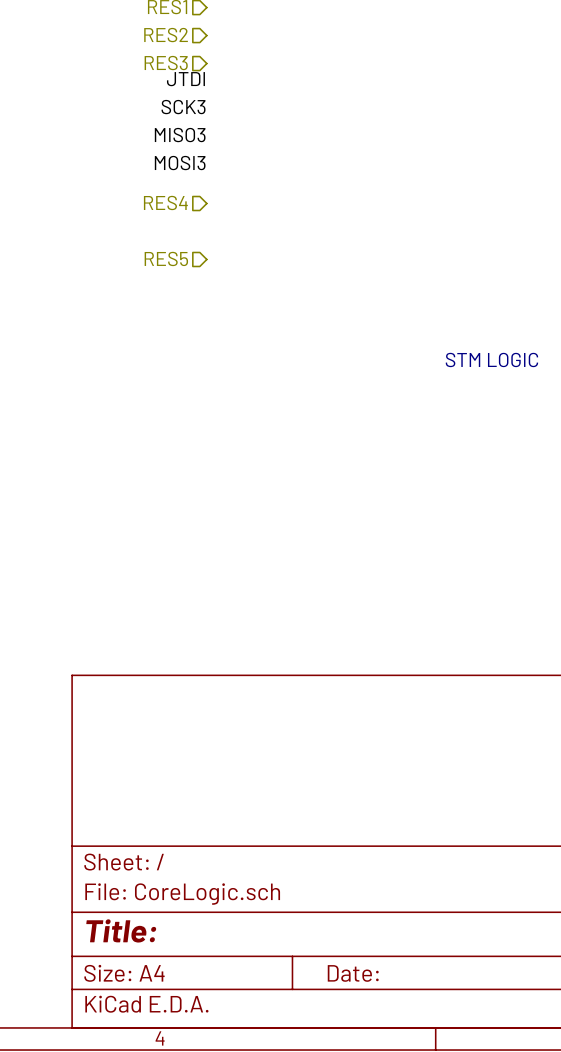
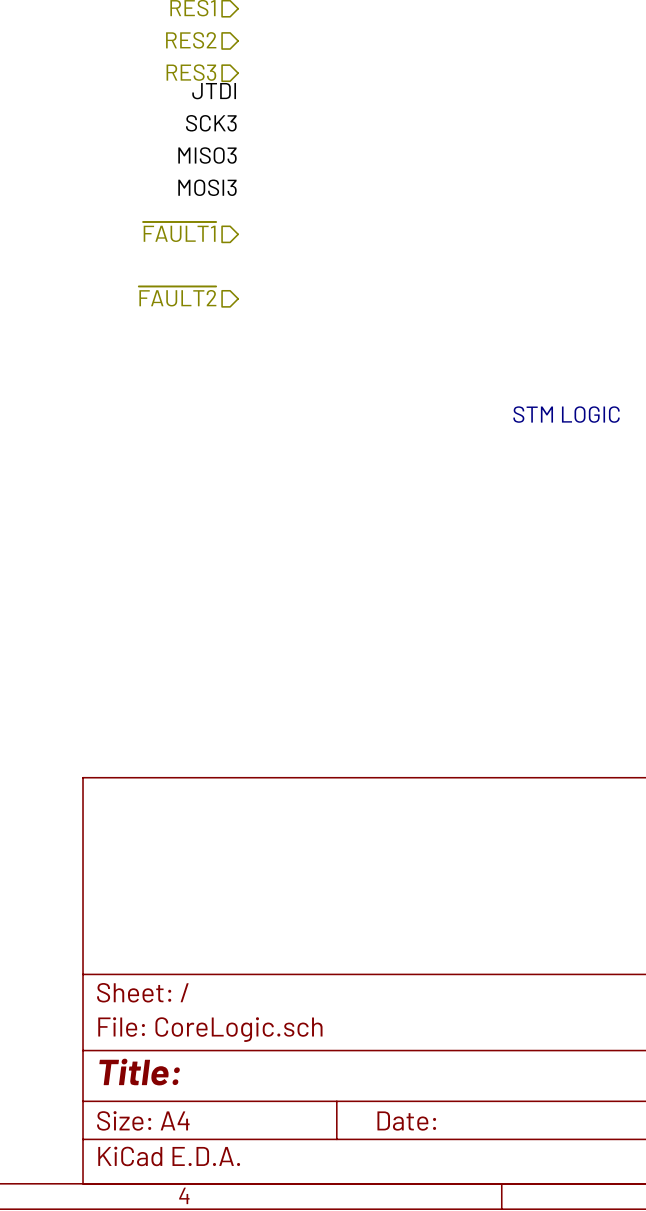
hierarchical label: RES4 (165, 202) -> ~{FAULT1} (179, 231)
hierarchical label: RES5 (166, 258) -> ~{FAULT2} (177, 296)

